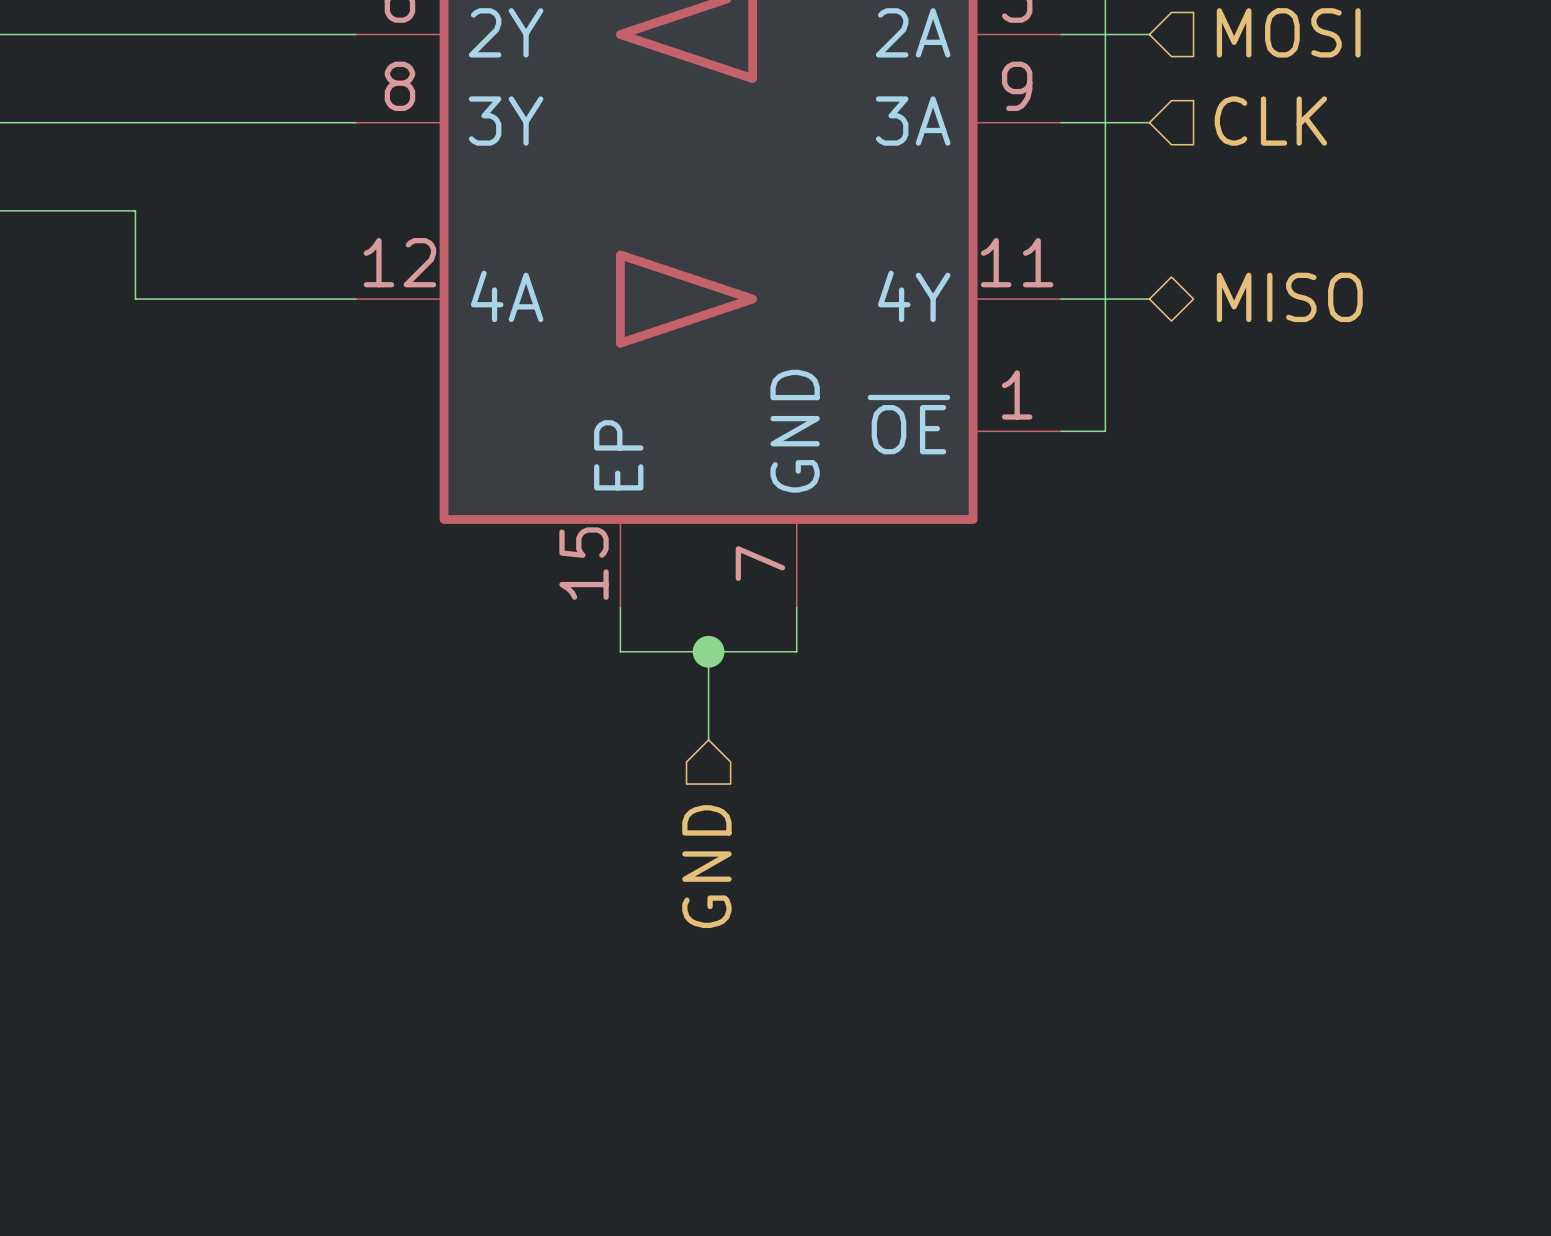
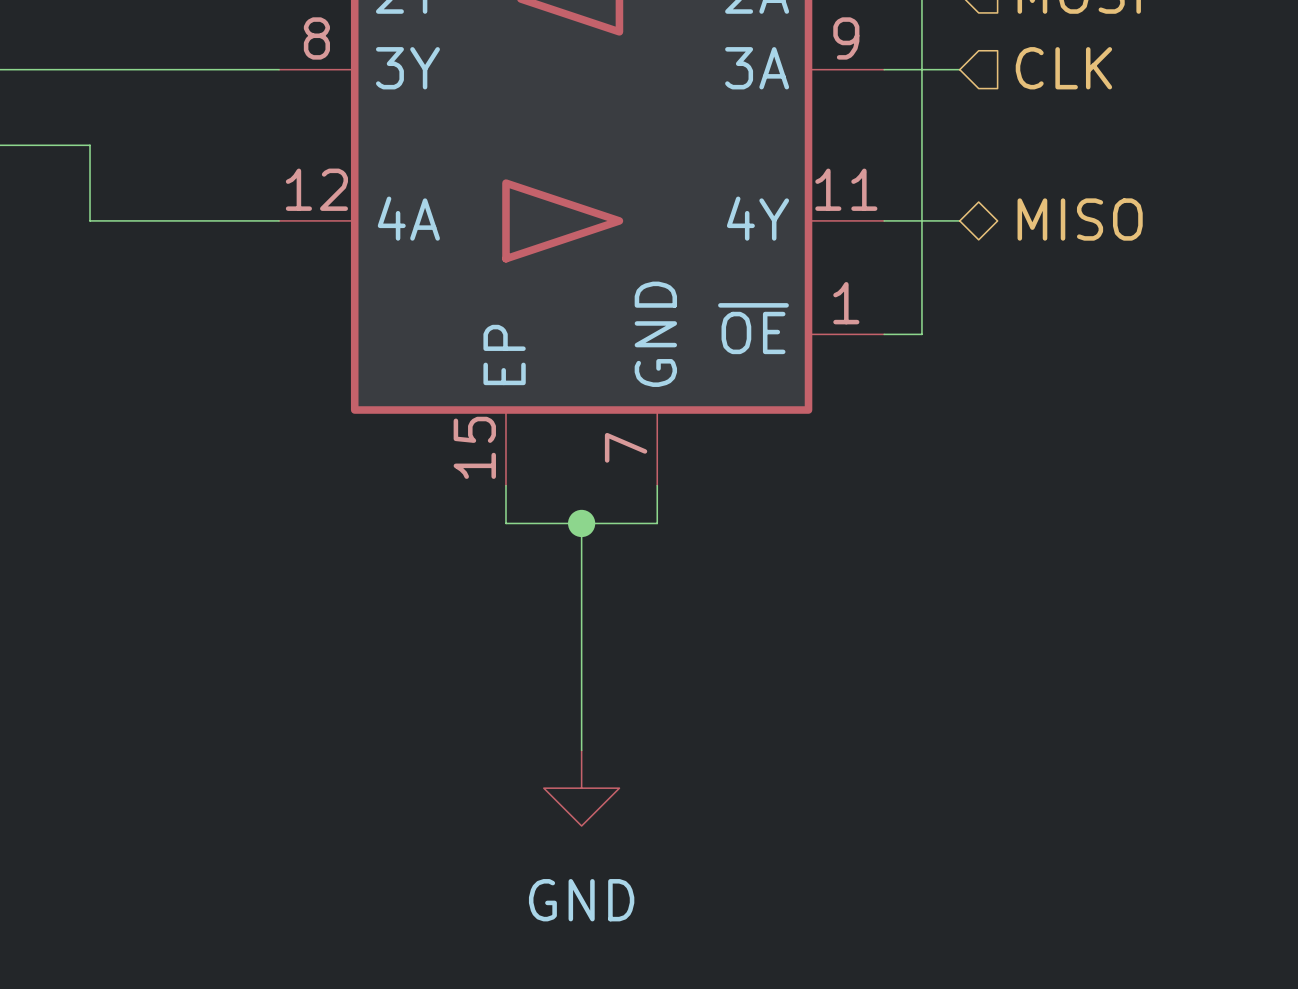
wire: none -> (581, 599) (581, 750)
hierarchical label: GND (706, 866) -> none
power symbol: none -> GND (581, 788)

